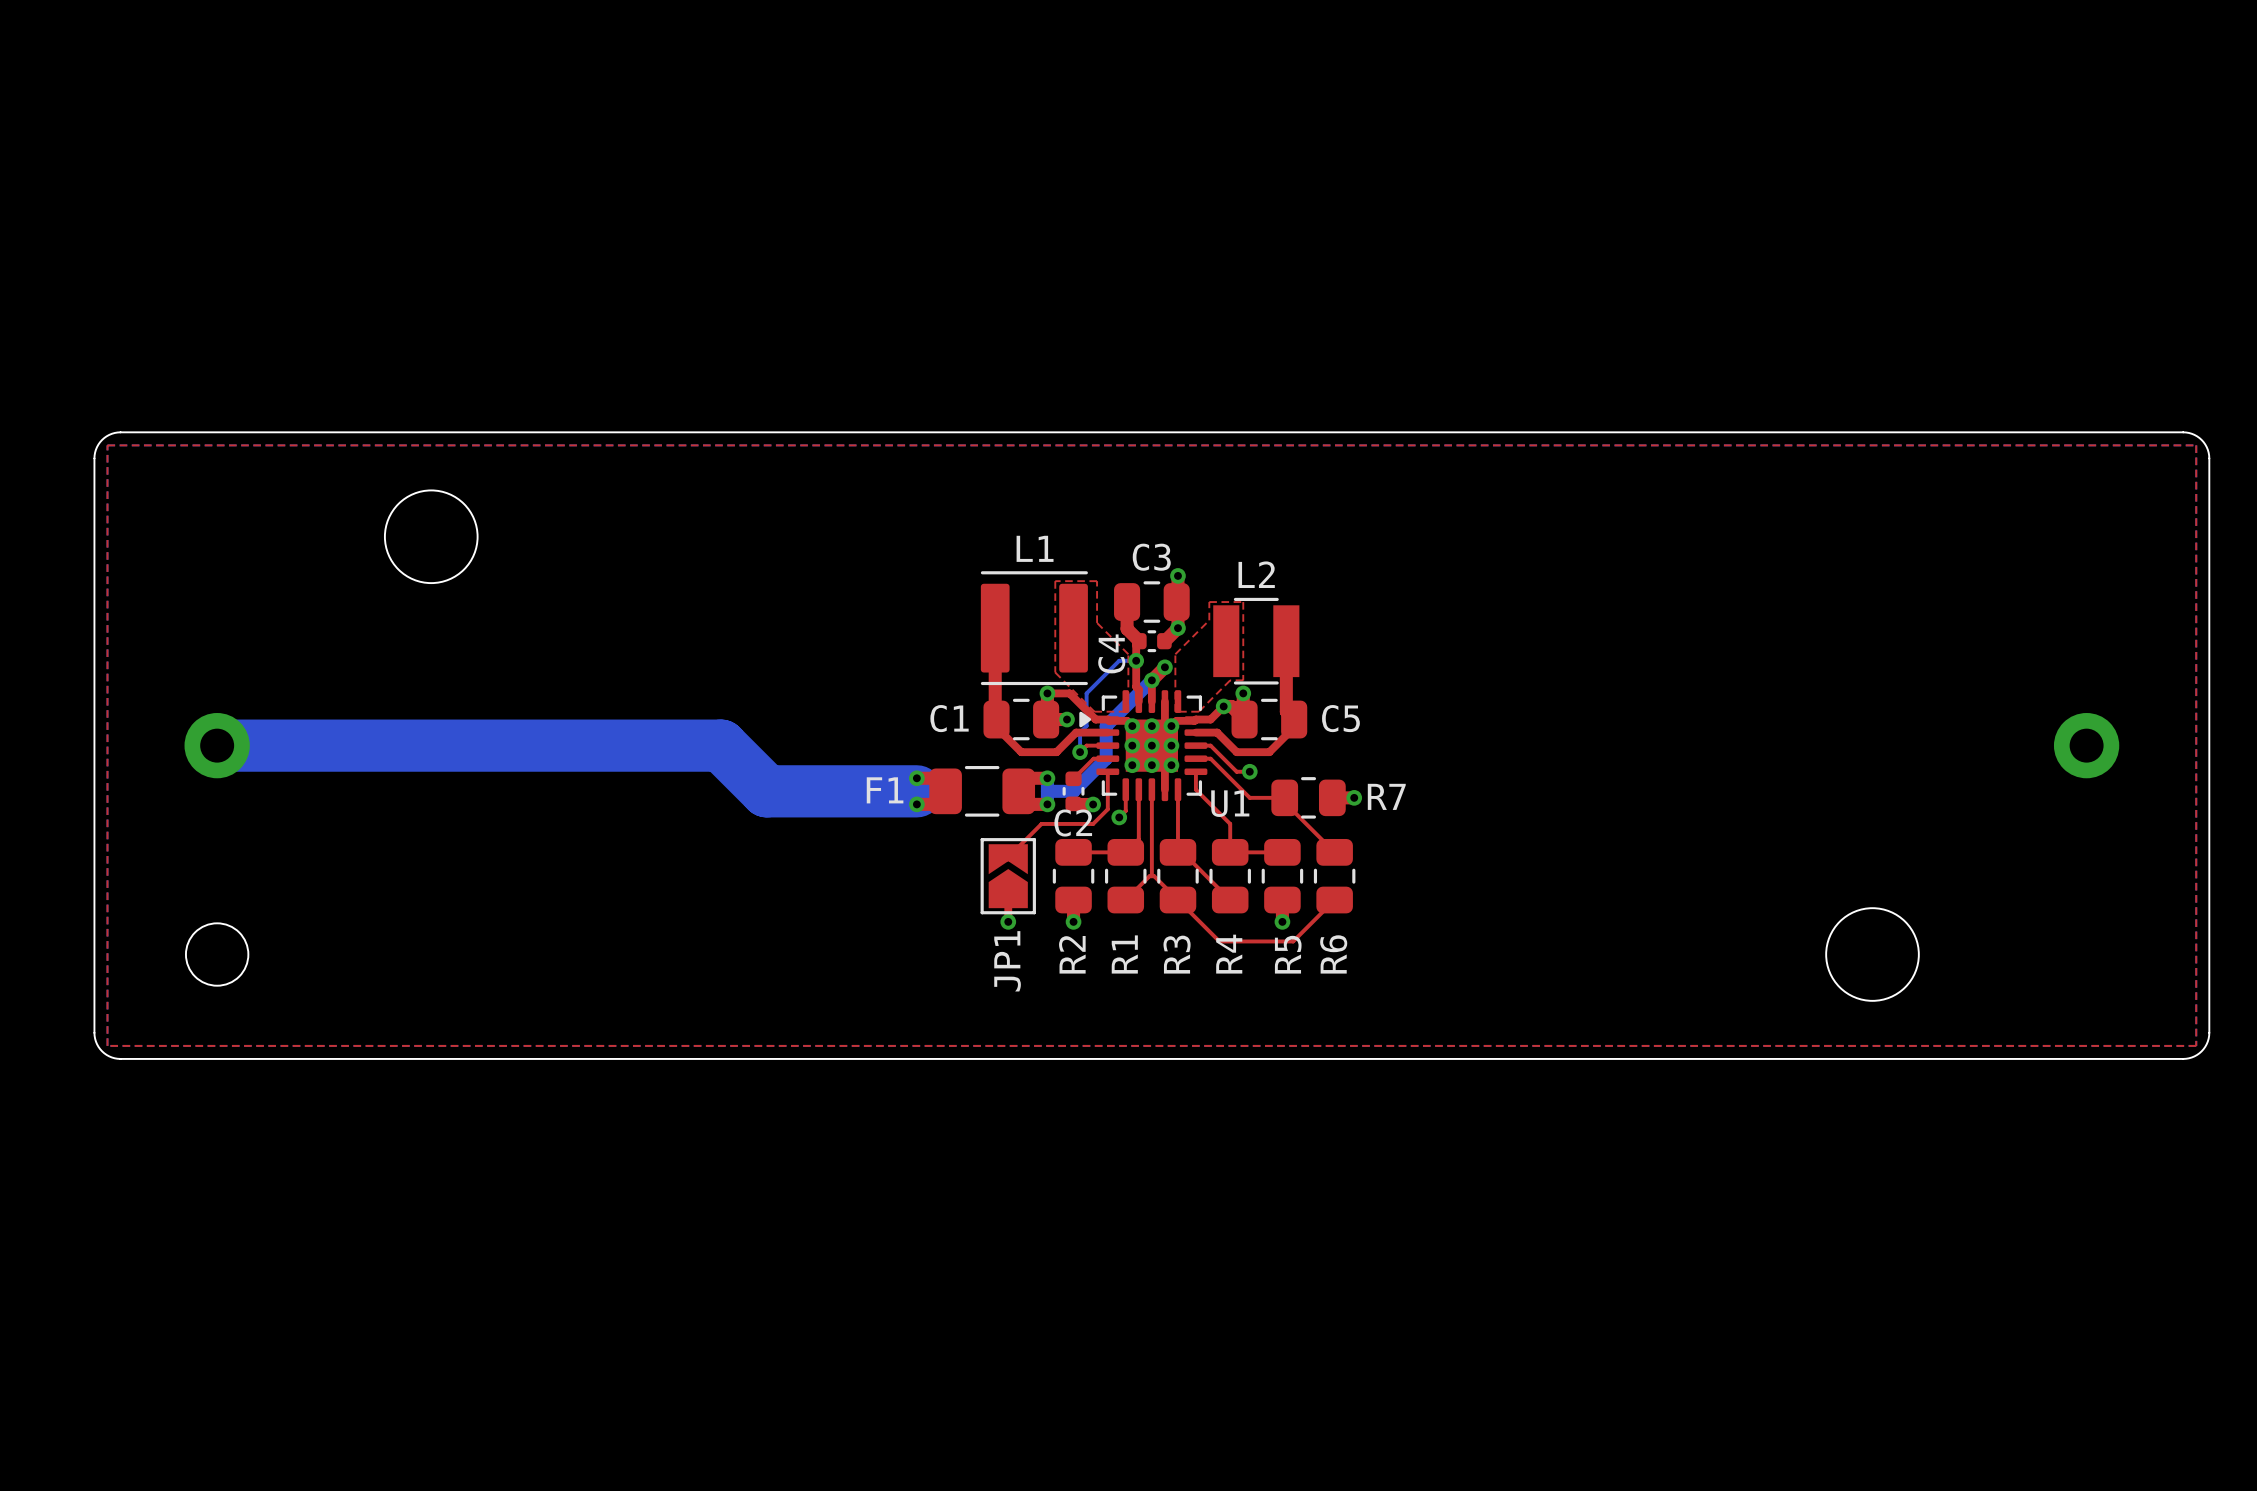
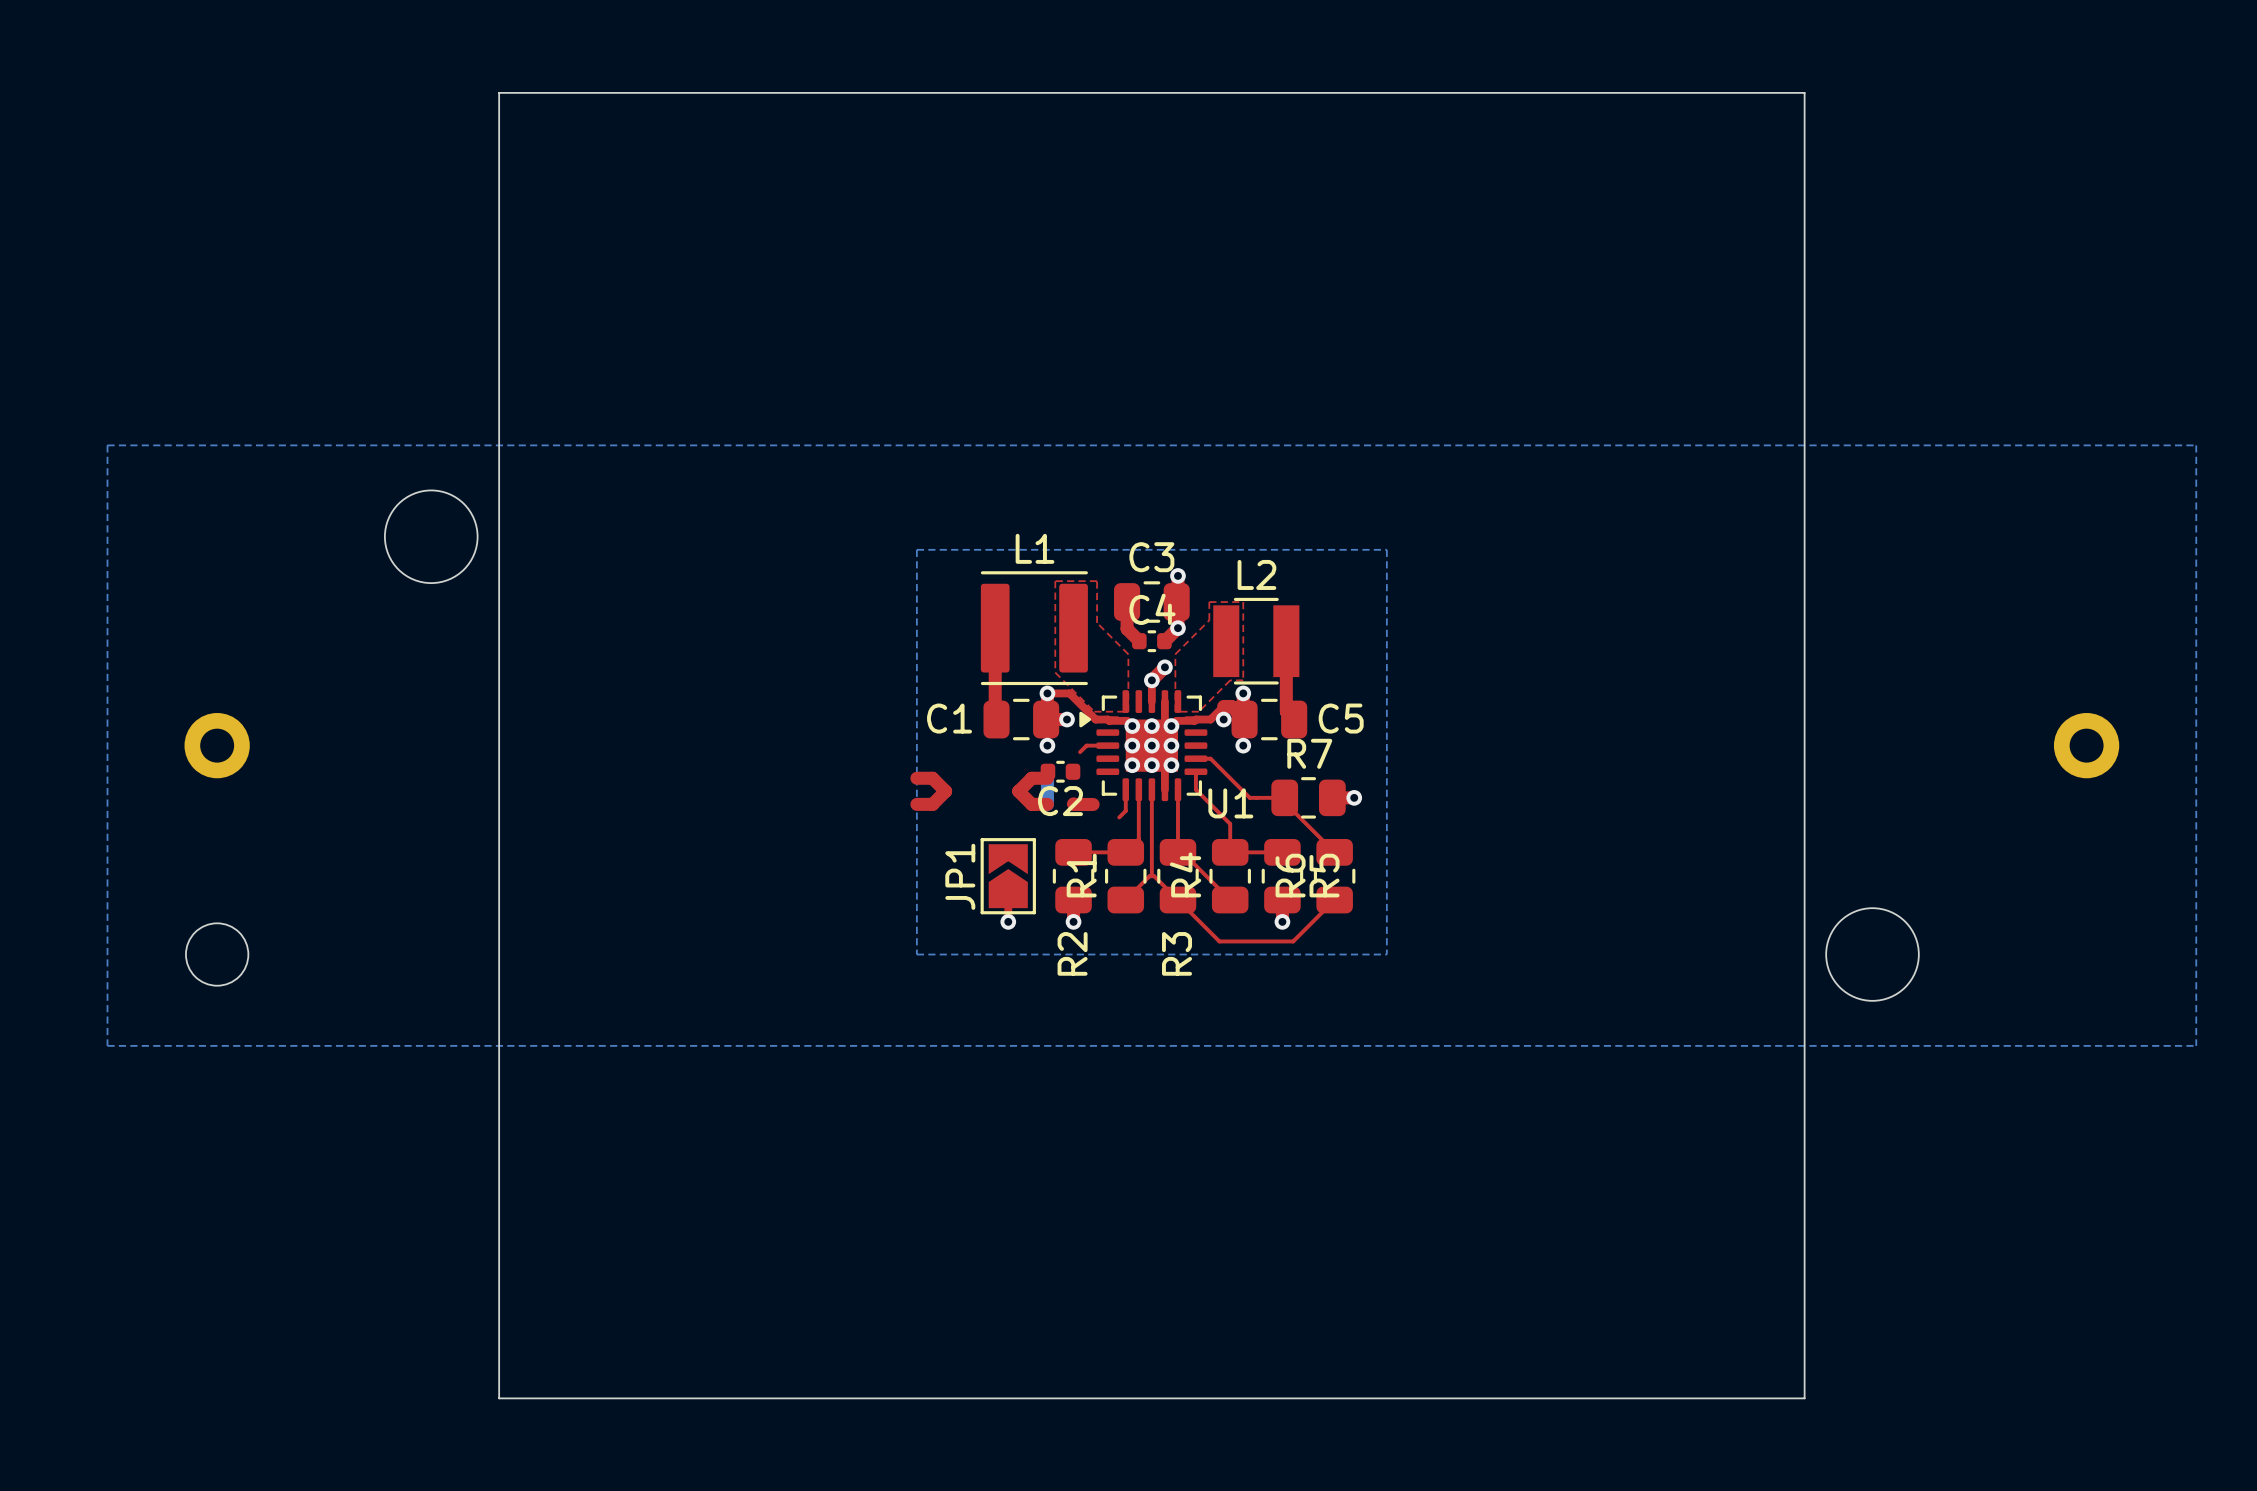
board edge: none -> (499, 92) (1804, 92) (1804, 1398) (499, 1398) (499, 92)
board edge: (120, 432) (2191, 433) (2203, 442) (2209, 458) (2207, 1041) (2199, 1053) (2183, 1058) (111, 1057) (100, 1049) (94, 1032) (94, 458) (95, 449) (102, 439) (111, 433) (120, 432) -> none
top zone outline: (107, 445) (107, 1045) (2196, 1045) (2196, 445) (107, 445) -> none
bottom zone outline: none -> (916, 549) (916, 954) (1386, 954) (1386, 549) (916, 549)
top track: (1139, 641) (1136, 644) (1136, 686) (1138, 689) (1138, 701) -> none
C4 name rotation: 0° (1111, 653) -> 90° clockwise (1152, 609)
bottom track: (1136, 660) (1119, 660) (1086, 693) (1086, 726) (1080, 732) (1080, 752) -> none
via: (1136, 660) -> none
bottom track: (1151, 680) (1106, 726) (1106, 758) (1073, 791) (1047, 791) -> none
via position: (1223, 706) -> (1223, 719)
top track: (996, 719) (996, 727) (1021, 752) (1056, 752) (1076, 732) (1107, 732) -> none
top track: (1294, 719) (1294, 727) (1269, 752) (1236, 752) (1217, 732) (1195, 732) -> none
bottom track: (217, 745) (721, 745) (766, 791) (916, 791) -> none
via: none -> (1047, 745)
top track: (1195, 745) (1210, 745) (1236, 771) (1249, 771) -> none
via: none -> (1243, 745)
via: (1080, 752) -> none
top track: (1107, 758) (1093, 758) (1073, 778) -> none
top track: (1107, 771) (1107, 809) (1093, 823) (1041, 823) (1008, 857) -> none
via: (1249, 771) -> none
via: (916, 778) -> none
via: (1047, 778) -> none
F1: (982, 791) -> none
C2 rotation: 0° (1073, 791) -> 90° clockwise (1060, 771)
R7 name position: R7 (1386, 796) -> R7 (1309, 753)
via: (916, 804) -> none
via: (1047, 804) -> none
via: (1093, 804) -> none
via: (1119, 817) -> none
R1 name position: R1 (1124, 954) -> R1 (1081, 875)
R4 name position: R4 (1229, 954) -> R4 (1185, 874)
R5 name position: R5 (1288, 954) -> R5 (1324, 875)
R6 name position: R6 (1333, 954) -> R6 (1290, 875)
JP1 name position: JP1 (1007, 961) -> JP1 (960, 876)

